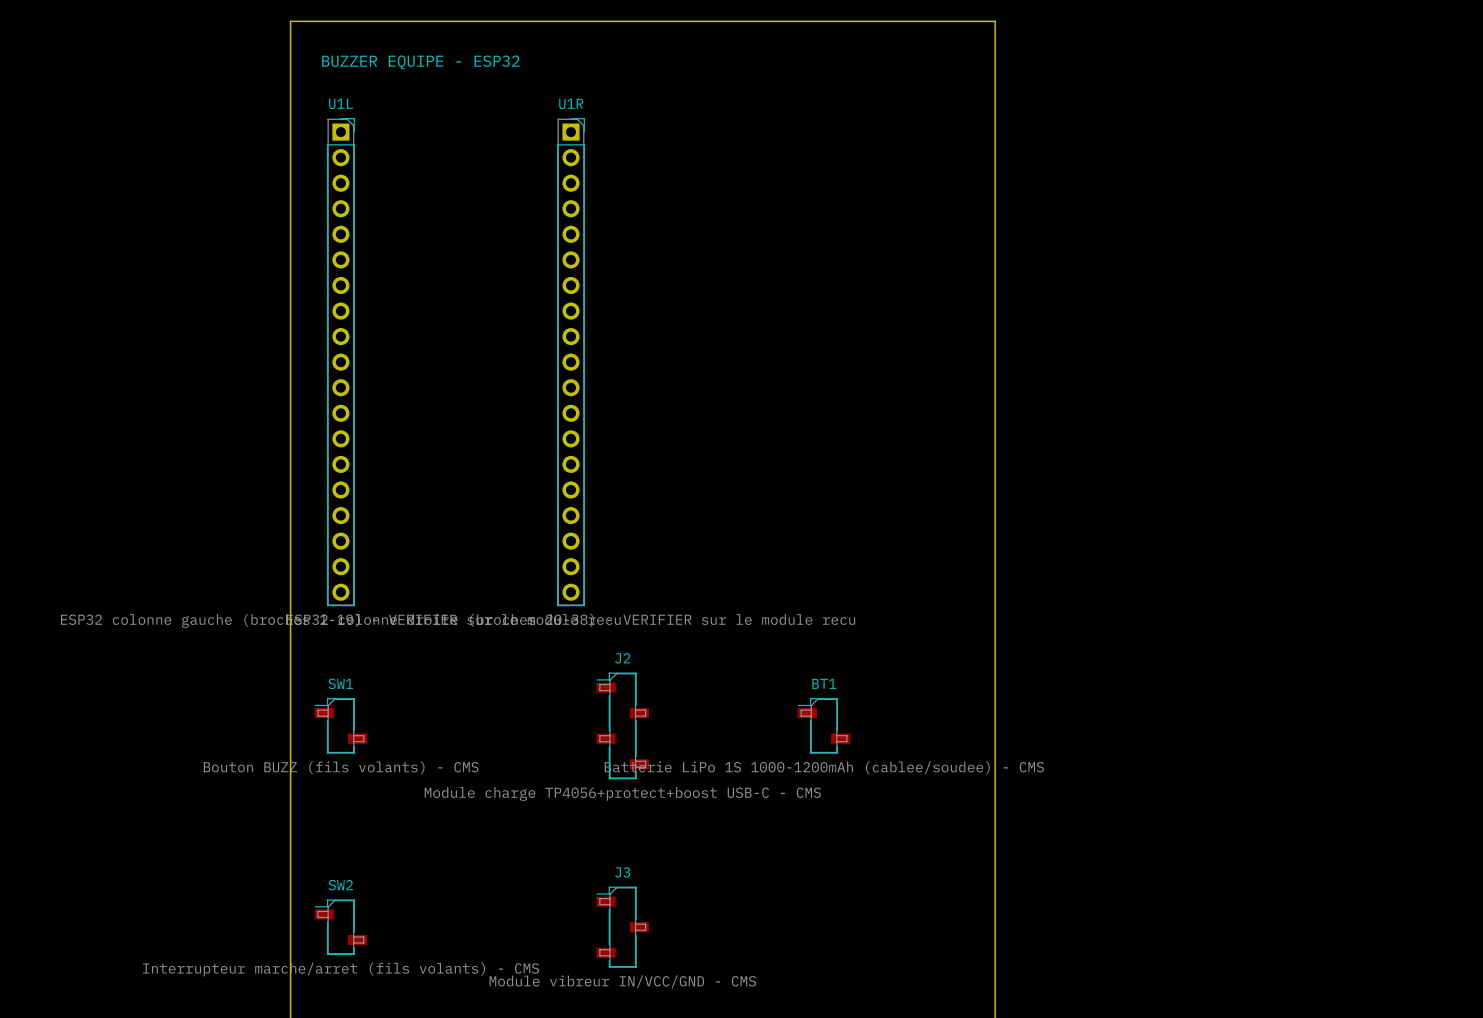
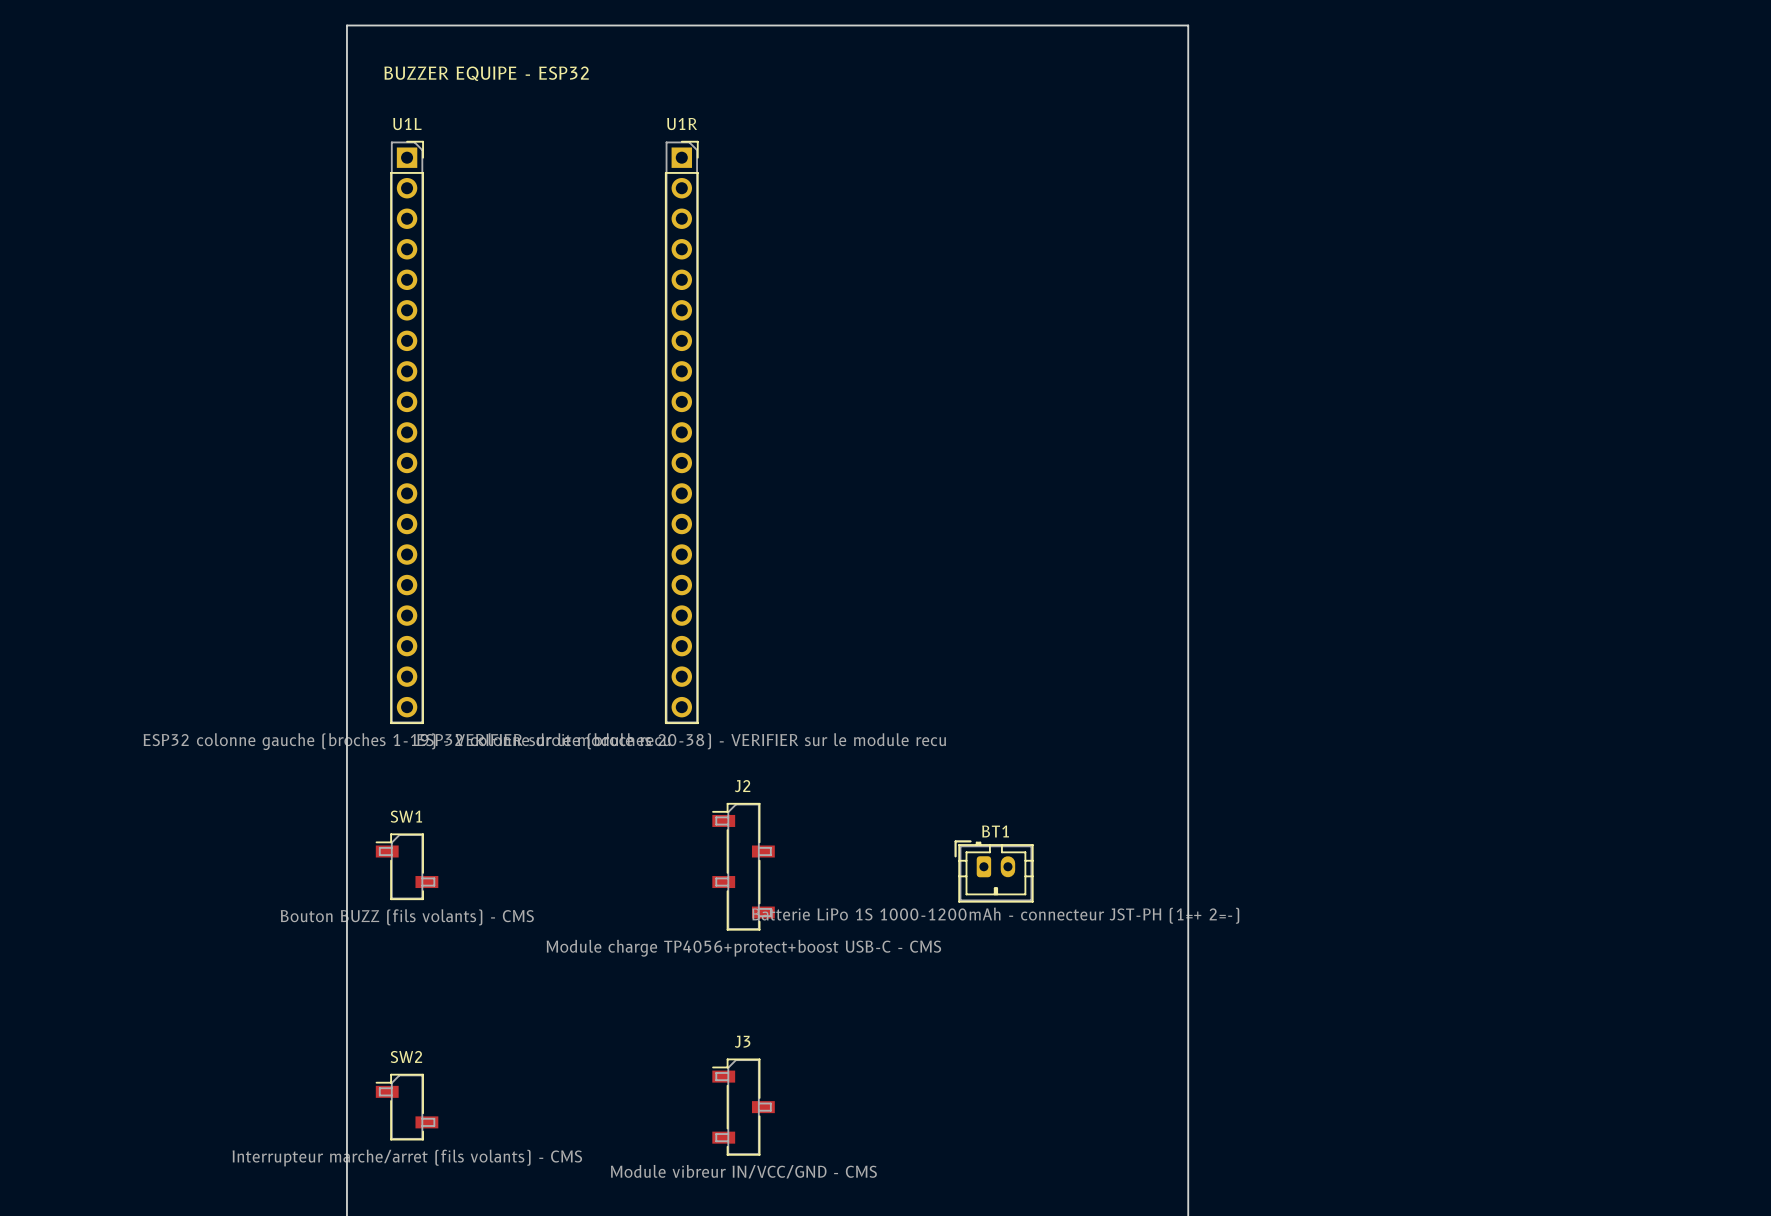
BT1 footprint: [797, 698, 851, 754] -> [954, 840, 1034, 903]
BT1 value: Batterie LiPo 1S 1000-1200mAh (cablee/soudee) - CMS (824, 767) -> Batterie LiPo 1S 1000-1200mAh - connecteur JST-PH (1=+ 2=-) (995, 915)

